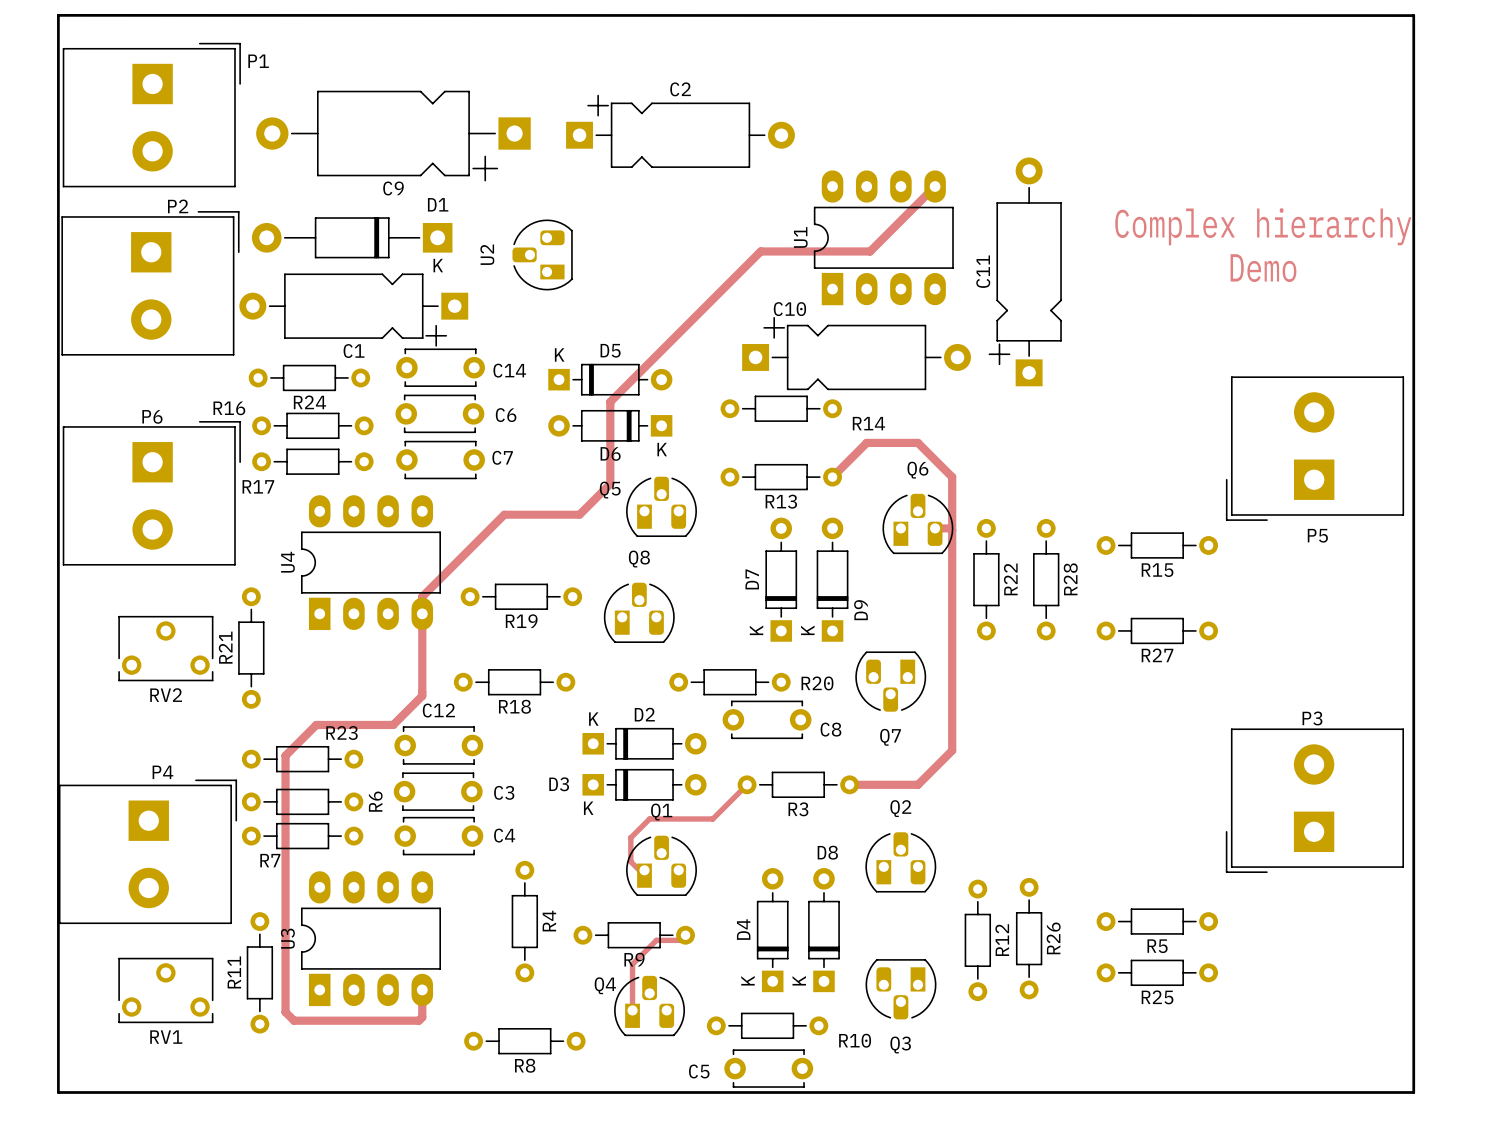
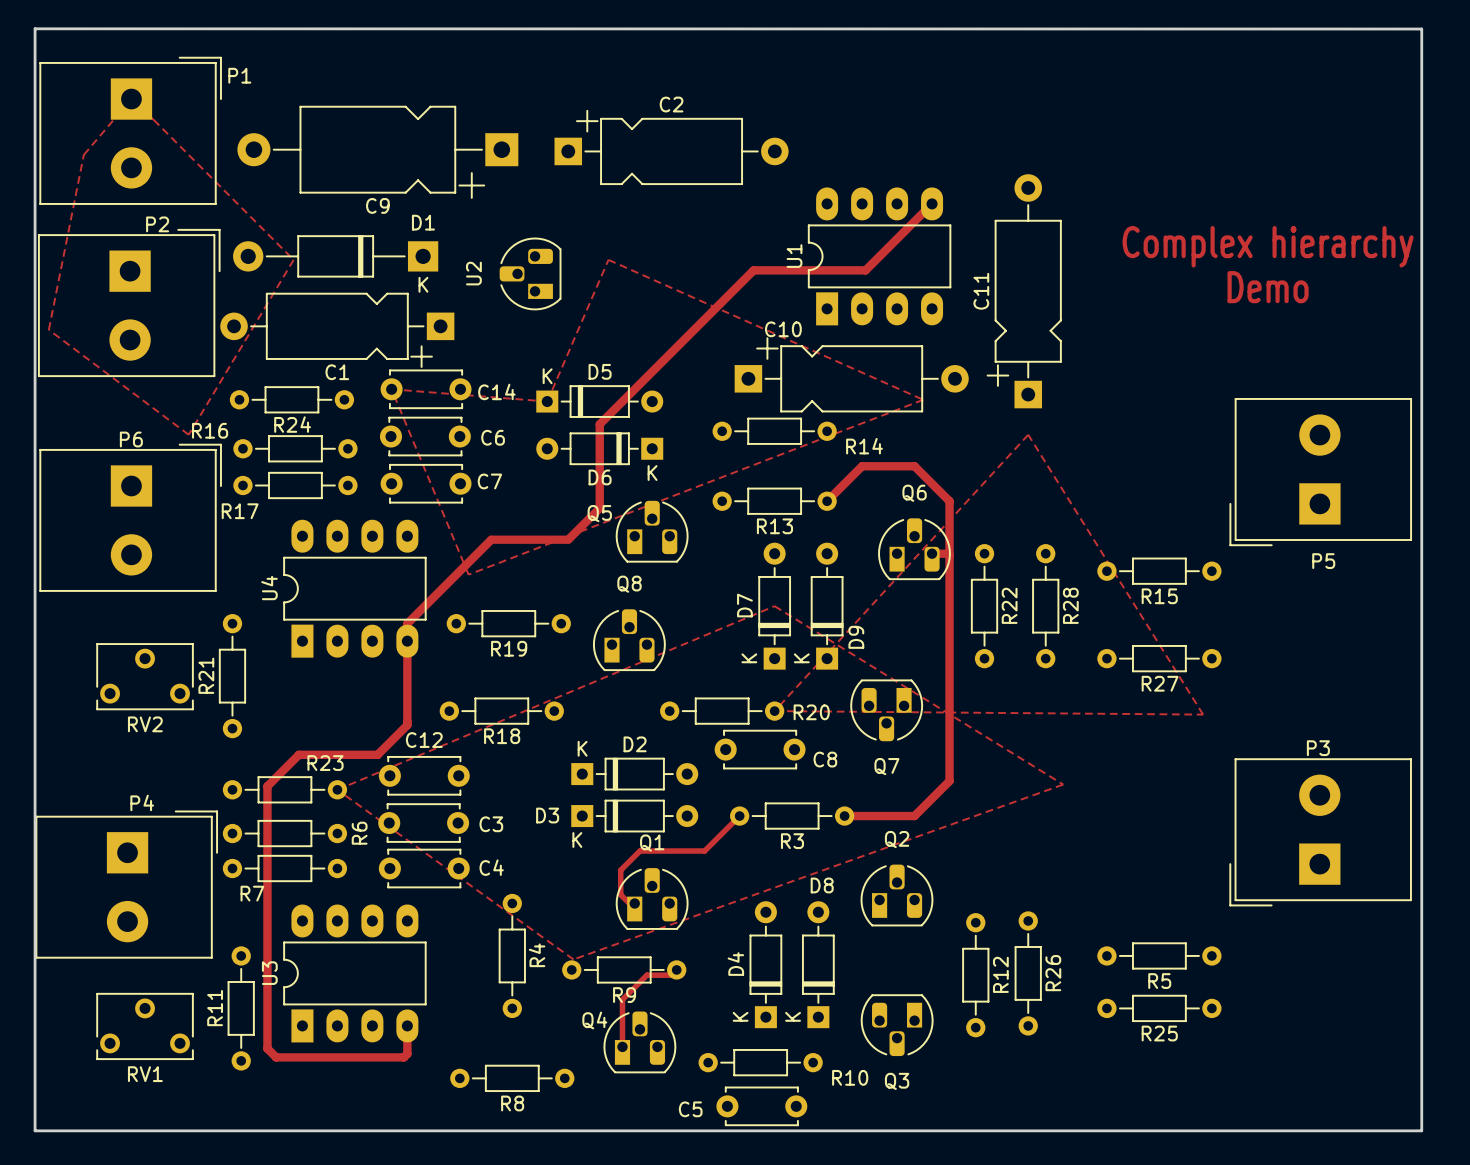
zone outline: none -> (131, 99) (83, 154) (48, 329) (188, 434) (293, 259) (131, 99)
zone outline: none -> (608, 259) (923, 399) (468, 574) (391, 389) (547, 401) (608, 259)
zone outline: none -> (1028, 434) (1203, 714) (774, 711) (1028, 434)
zone outline: none -> (774, 606) (1063, 784) (573, 959) (337, 789) (774, 606)

